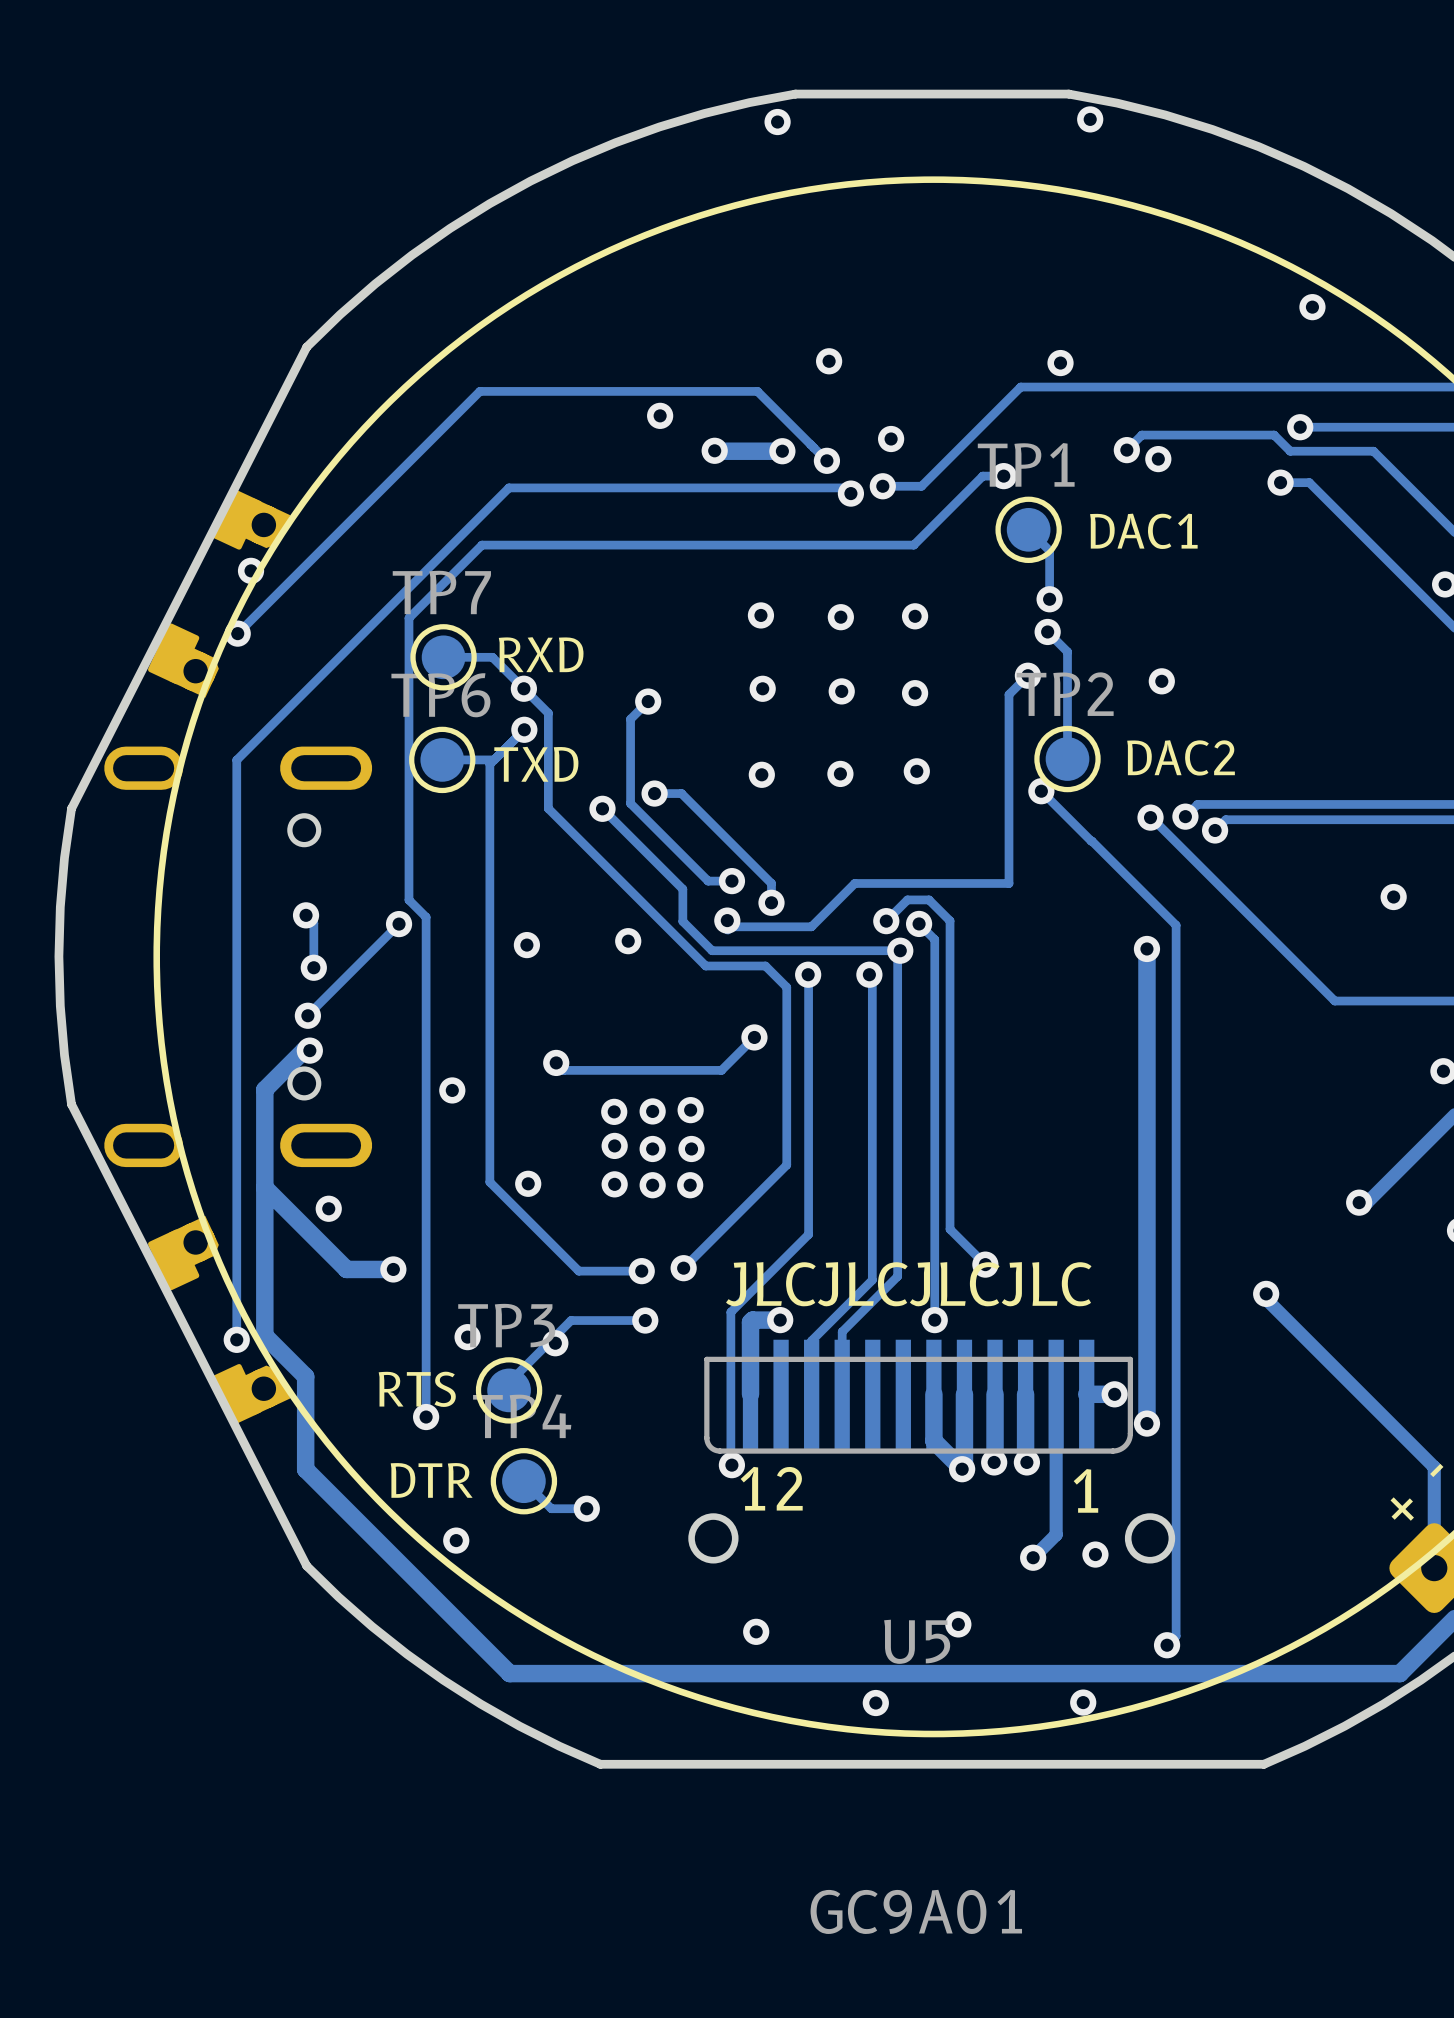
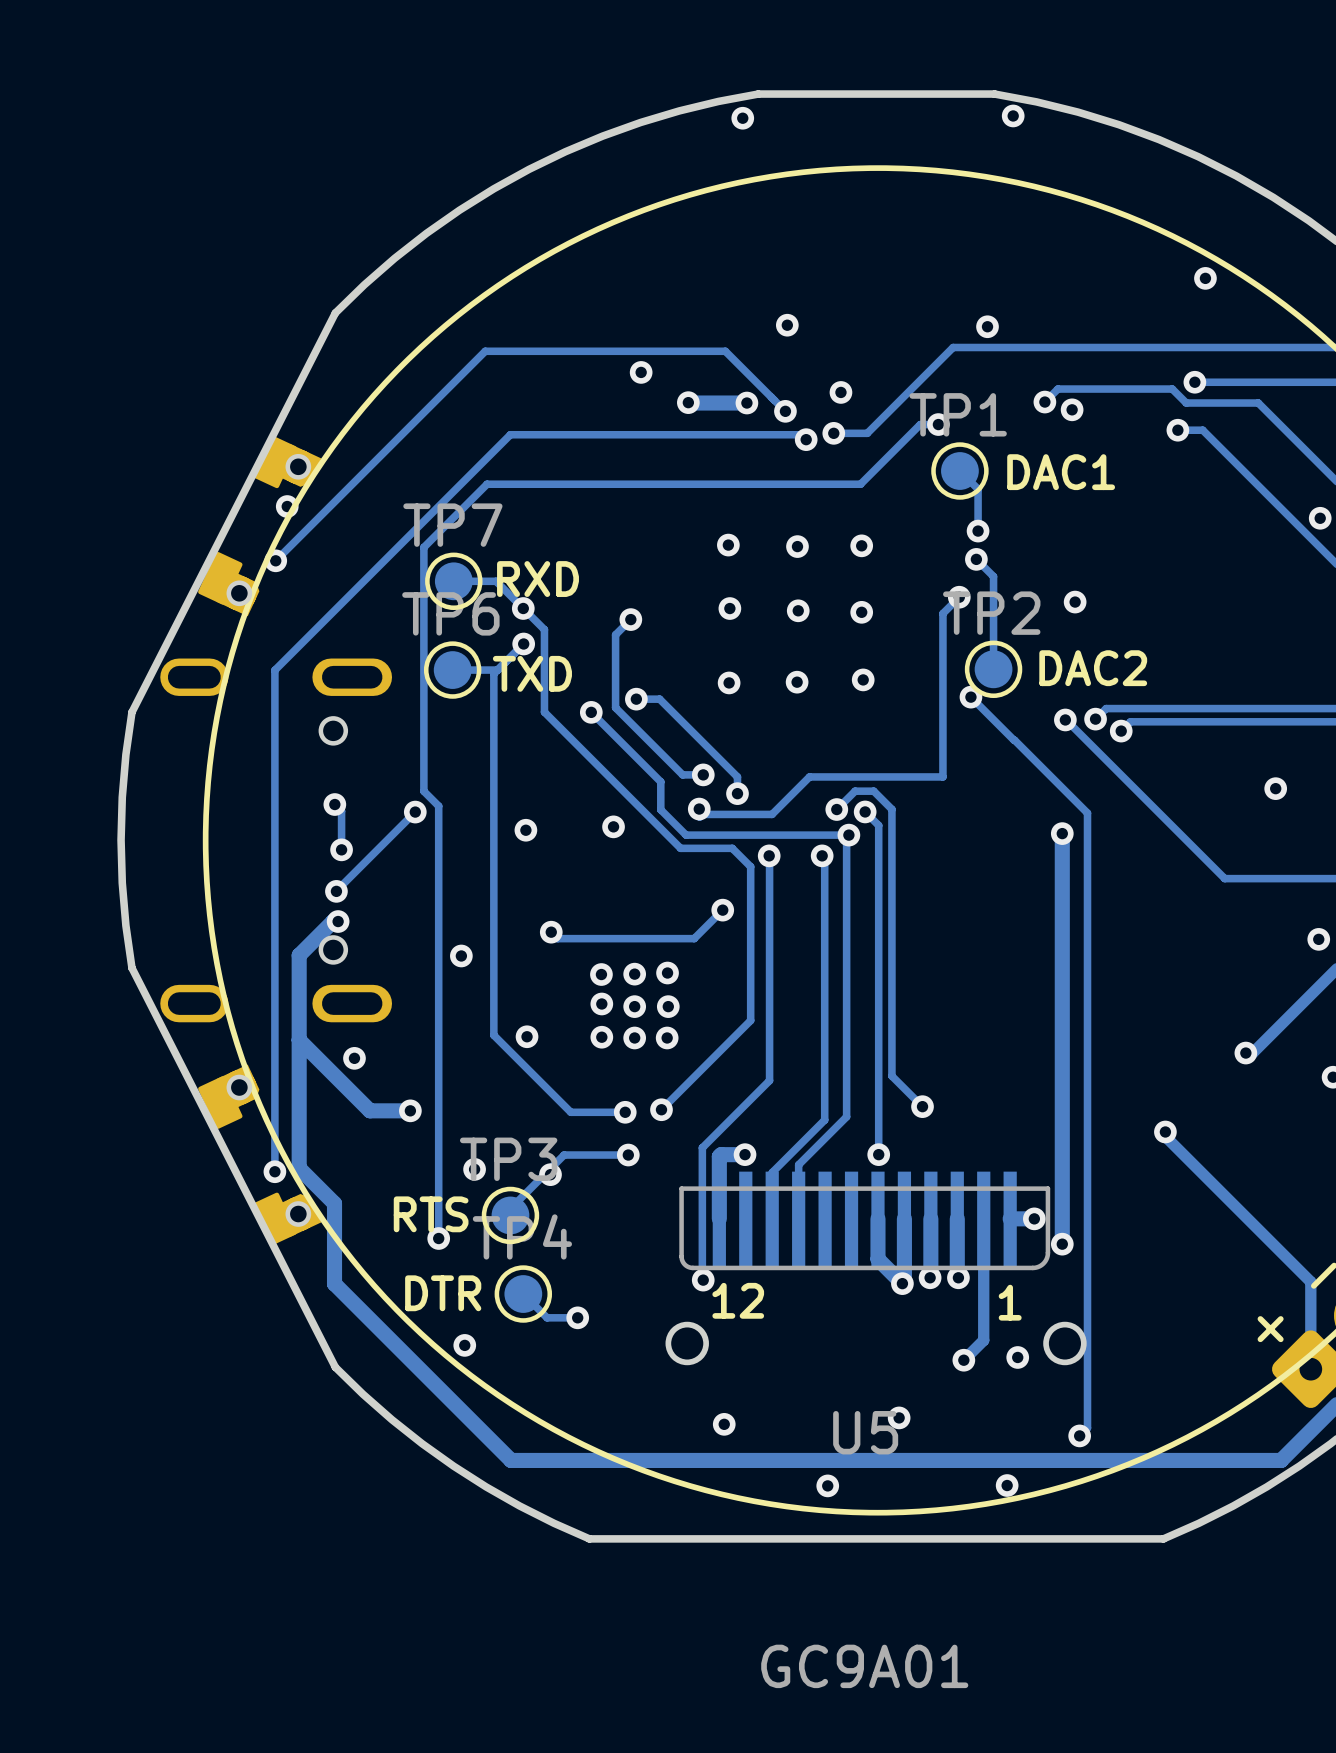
part footprint: [148, 488, 291, 698] -> [198, 435, 322, 617]
part footprint: [148, 1215, 291, 1425] -> [198, 1064, 322, 1246]
text: JLCJLCJLCJLC (908, 1284) -> none
U5 footprint: [688, 1339, 1176, 1564] -> [665, 1171, 1087, 1366]

